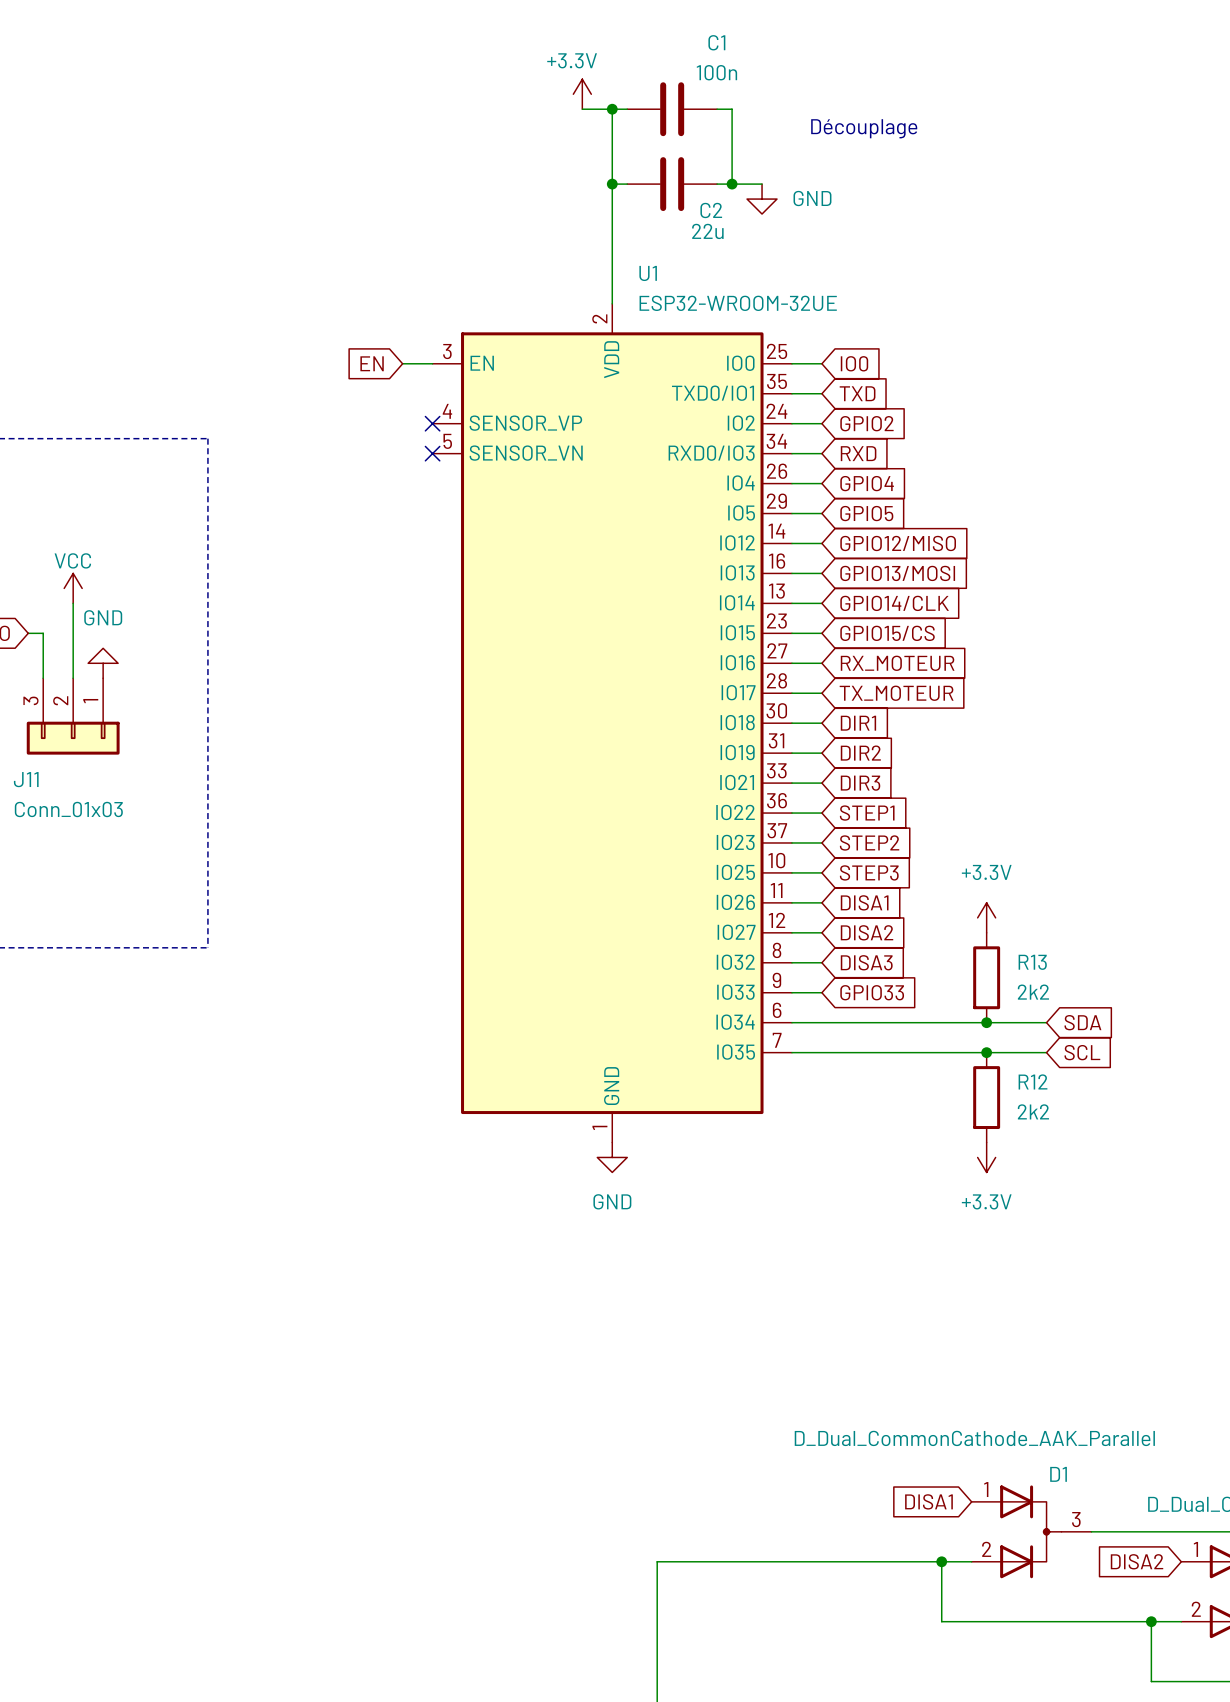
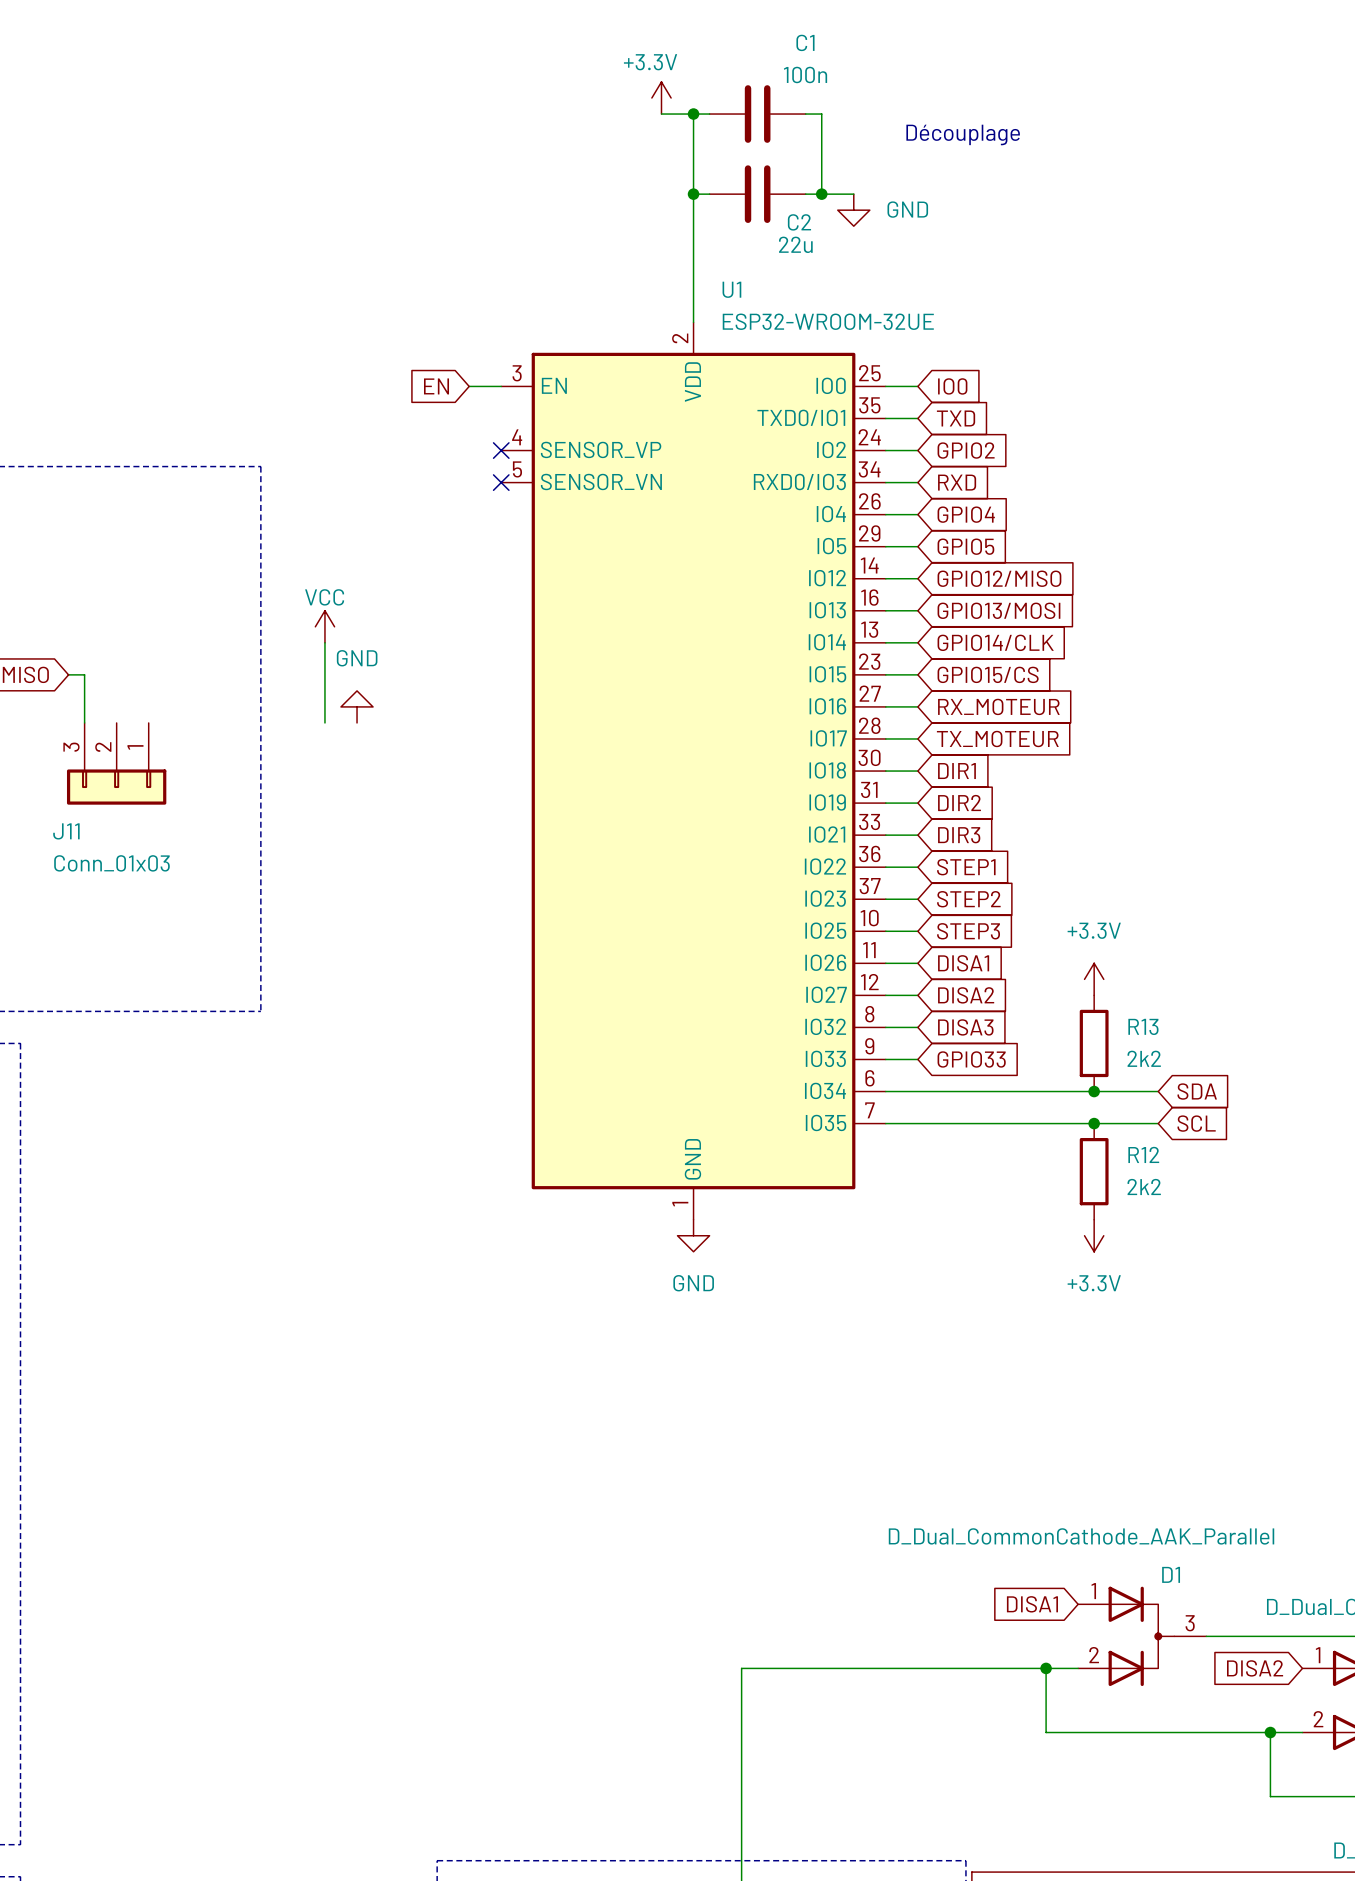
power symbol: VCC (73, 588) -> none
power symbol: none -> VCC (324, 626)
wire: (73, 603) (73, 678) -> (324, 642) (324, 722)
power symbol: GND (103, 663) -> none
power symbol: none -> GND (357, 706)

